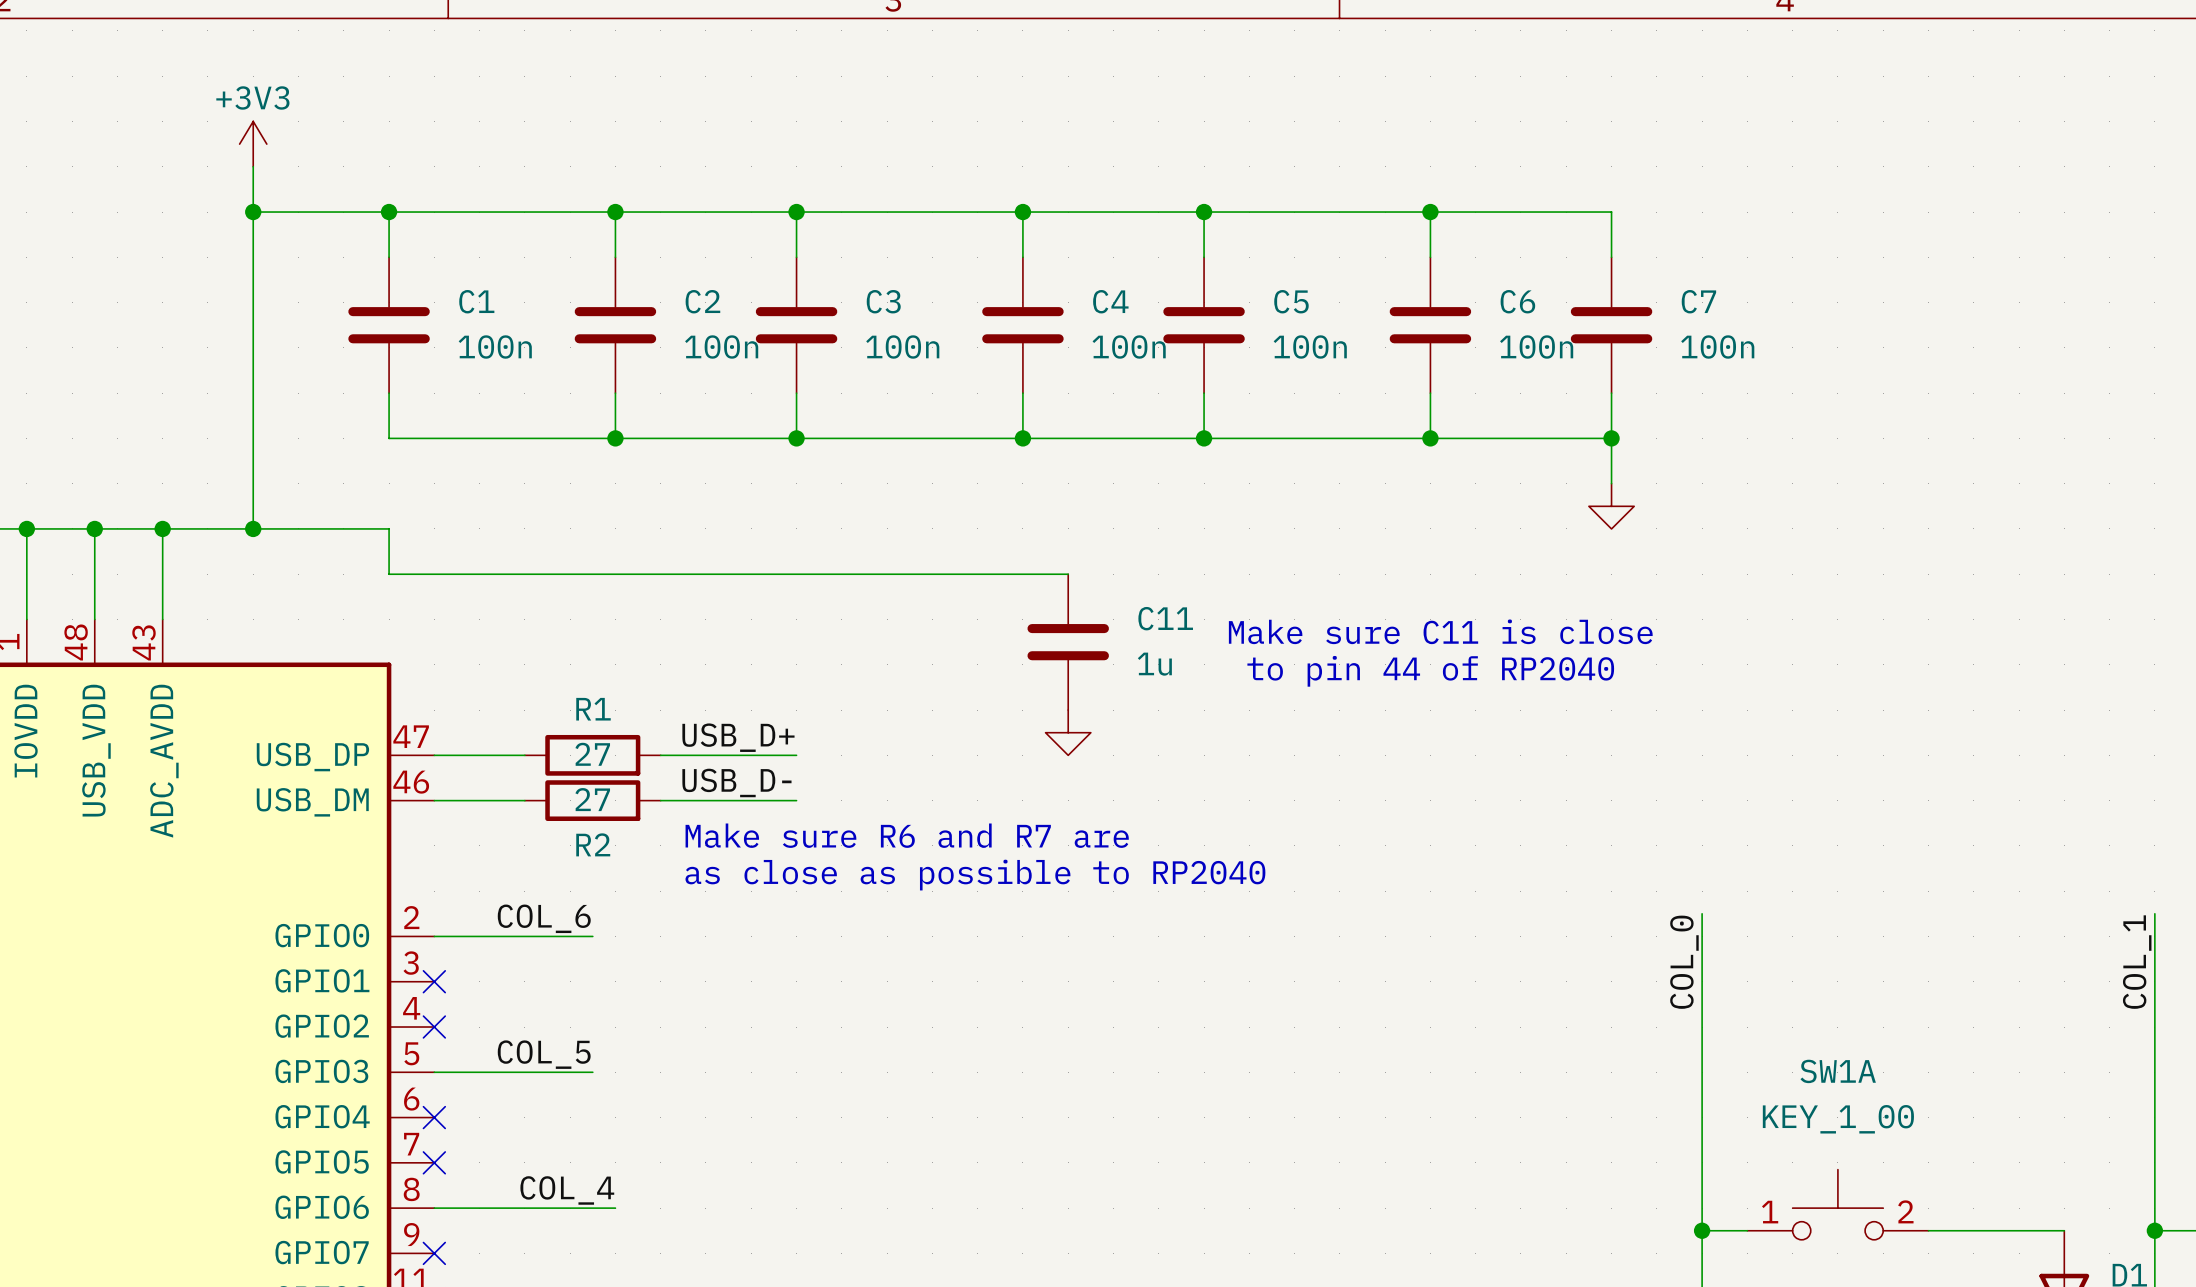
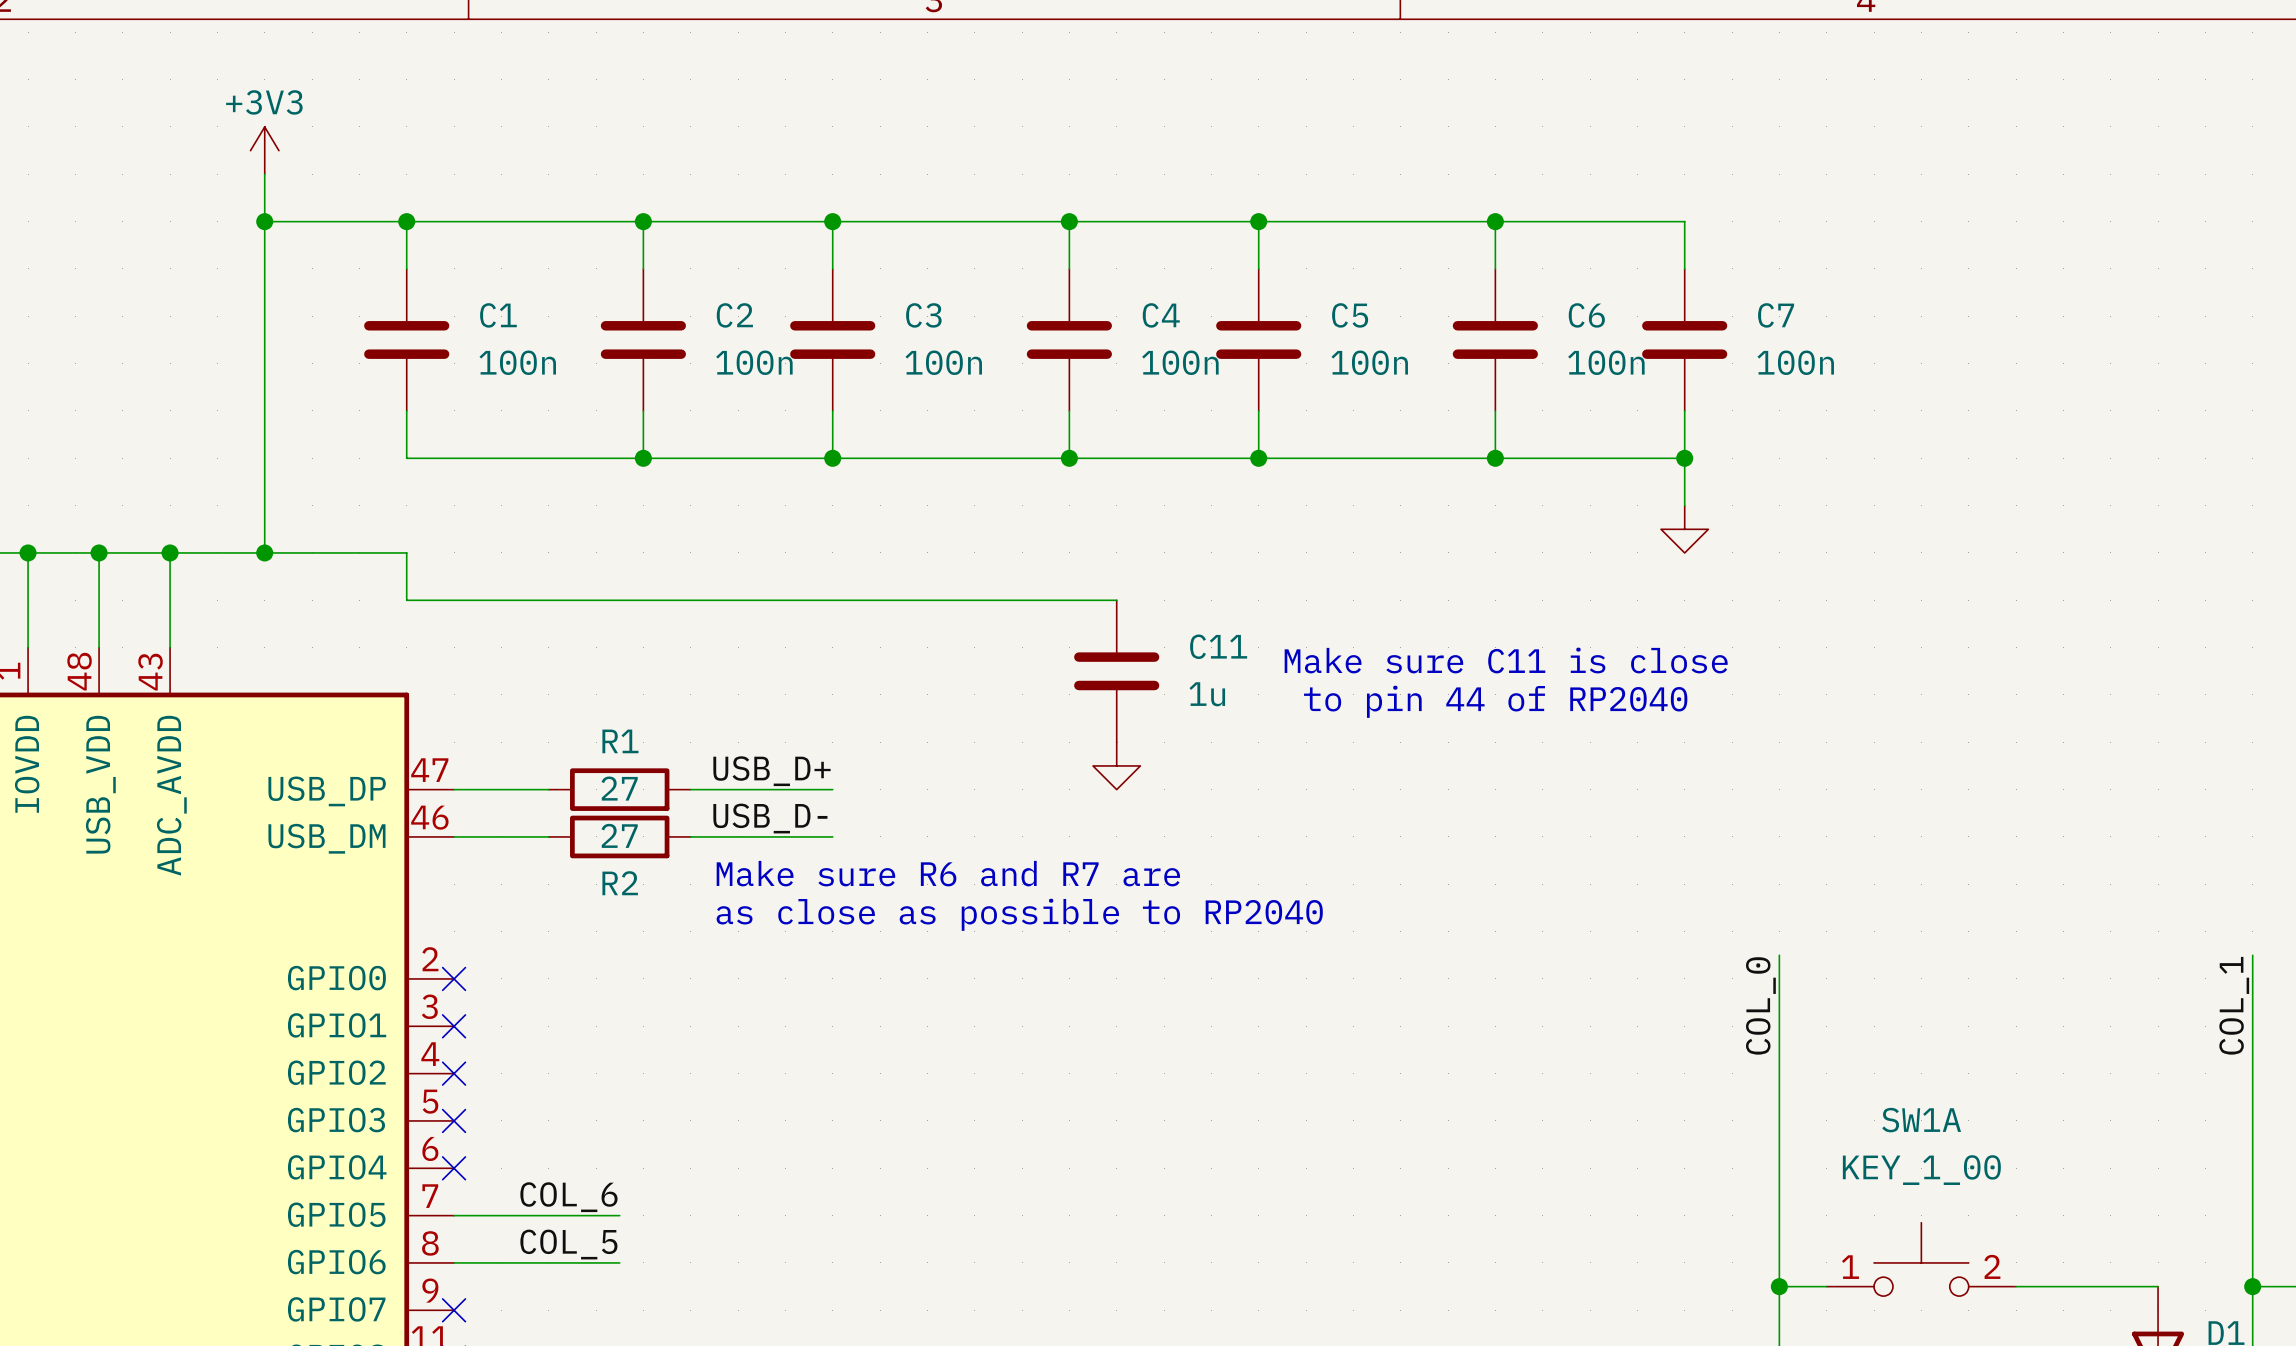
label position: COL_6 (544, 918) -> COL_6 (568, 1197)
wire: (434, 936) (592, 936) -> none
no-connect mark: none -> (454, 978)
label position: COL_5 (544, 1054) -> COL_5 (568, 1244)
wire: (434, 1072) (592, 1072) -> (454, 1215) (619, 1215)
no-connect mark position: (434, 1162) -> (454, 1120)
label: COL_4 (567, 1190) -> none
wire: (592, 1208) (615, 1208) -> none

